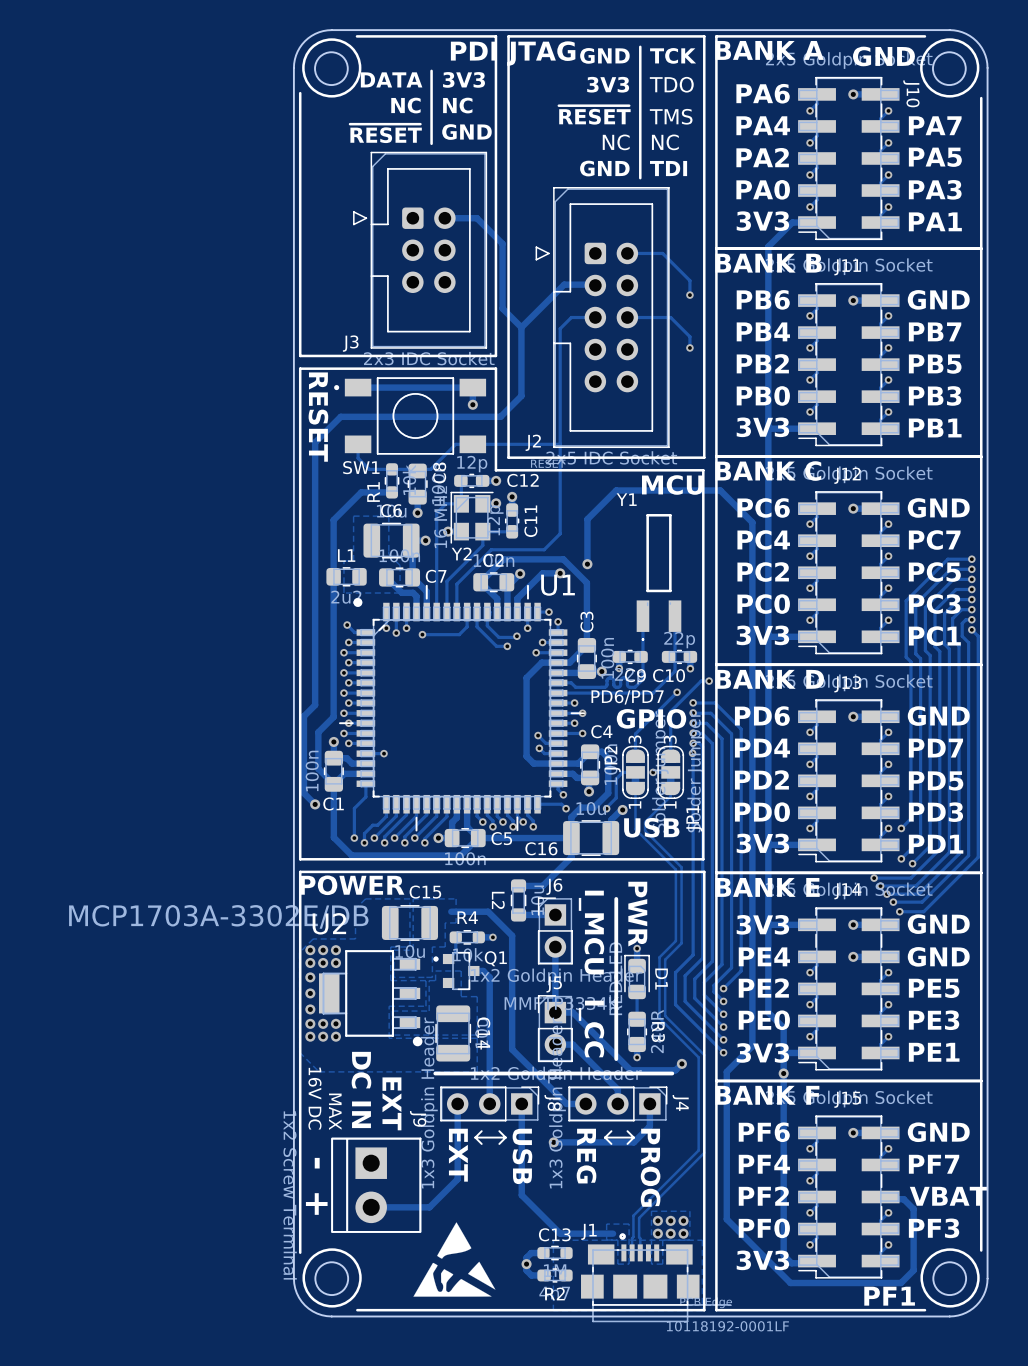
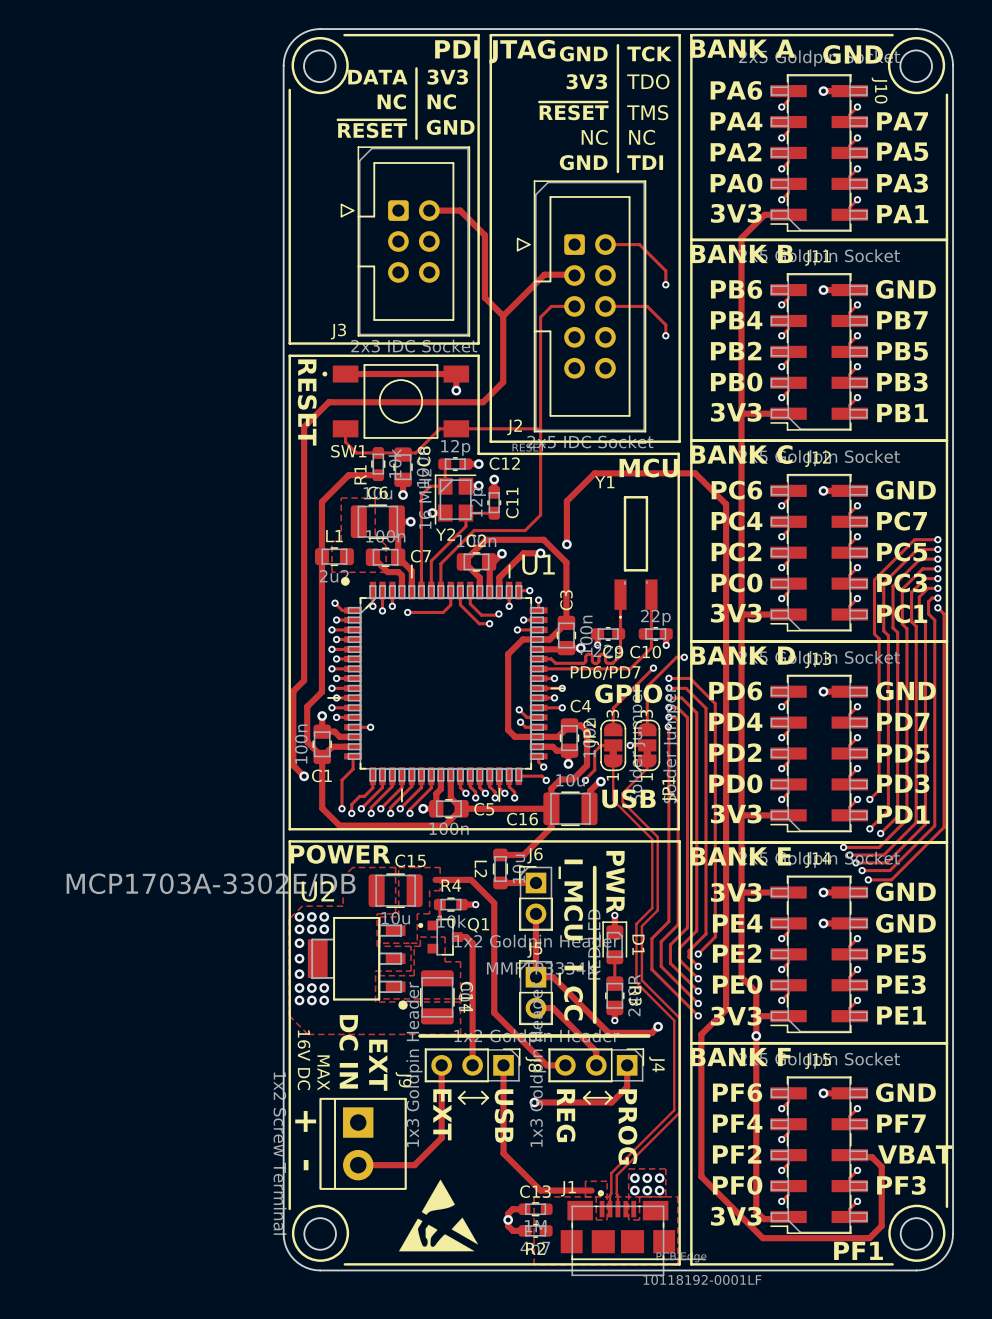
text position: - (317, 1163) -> - (306, 1165)
text position: + (316, 1204) -> + (305, 1121)

